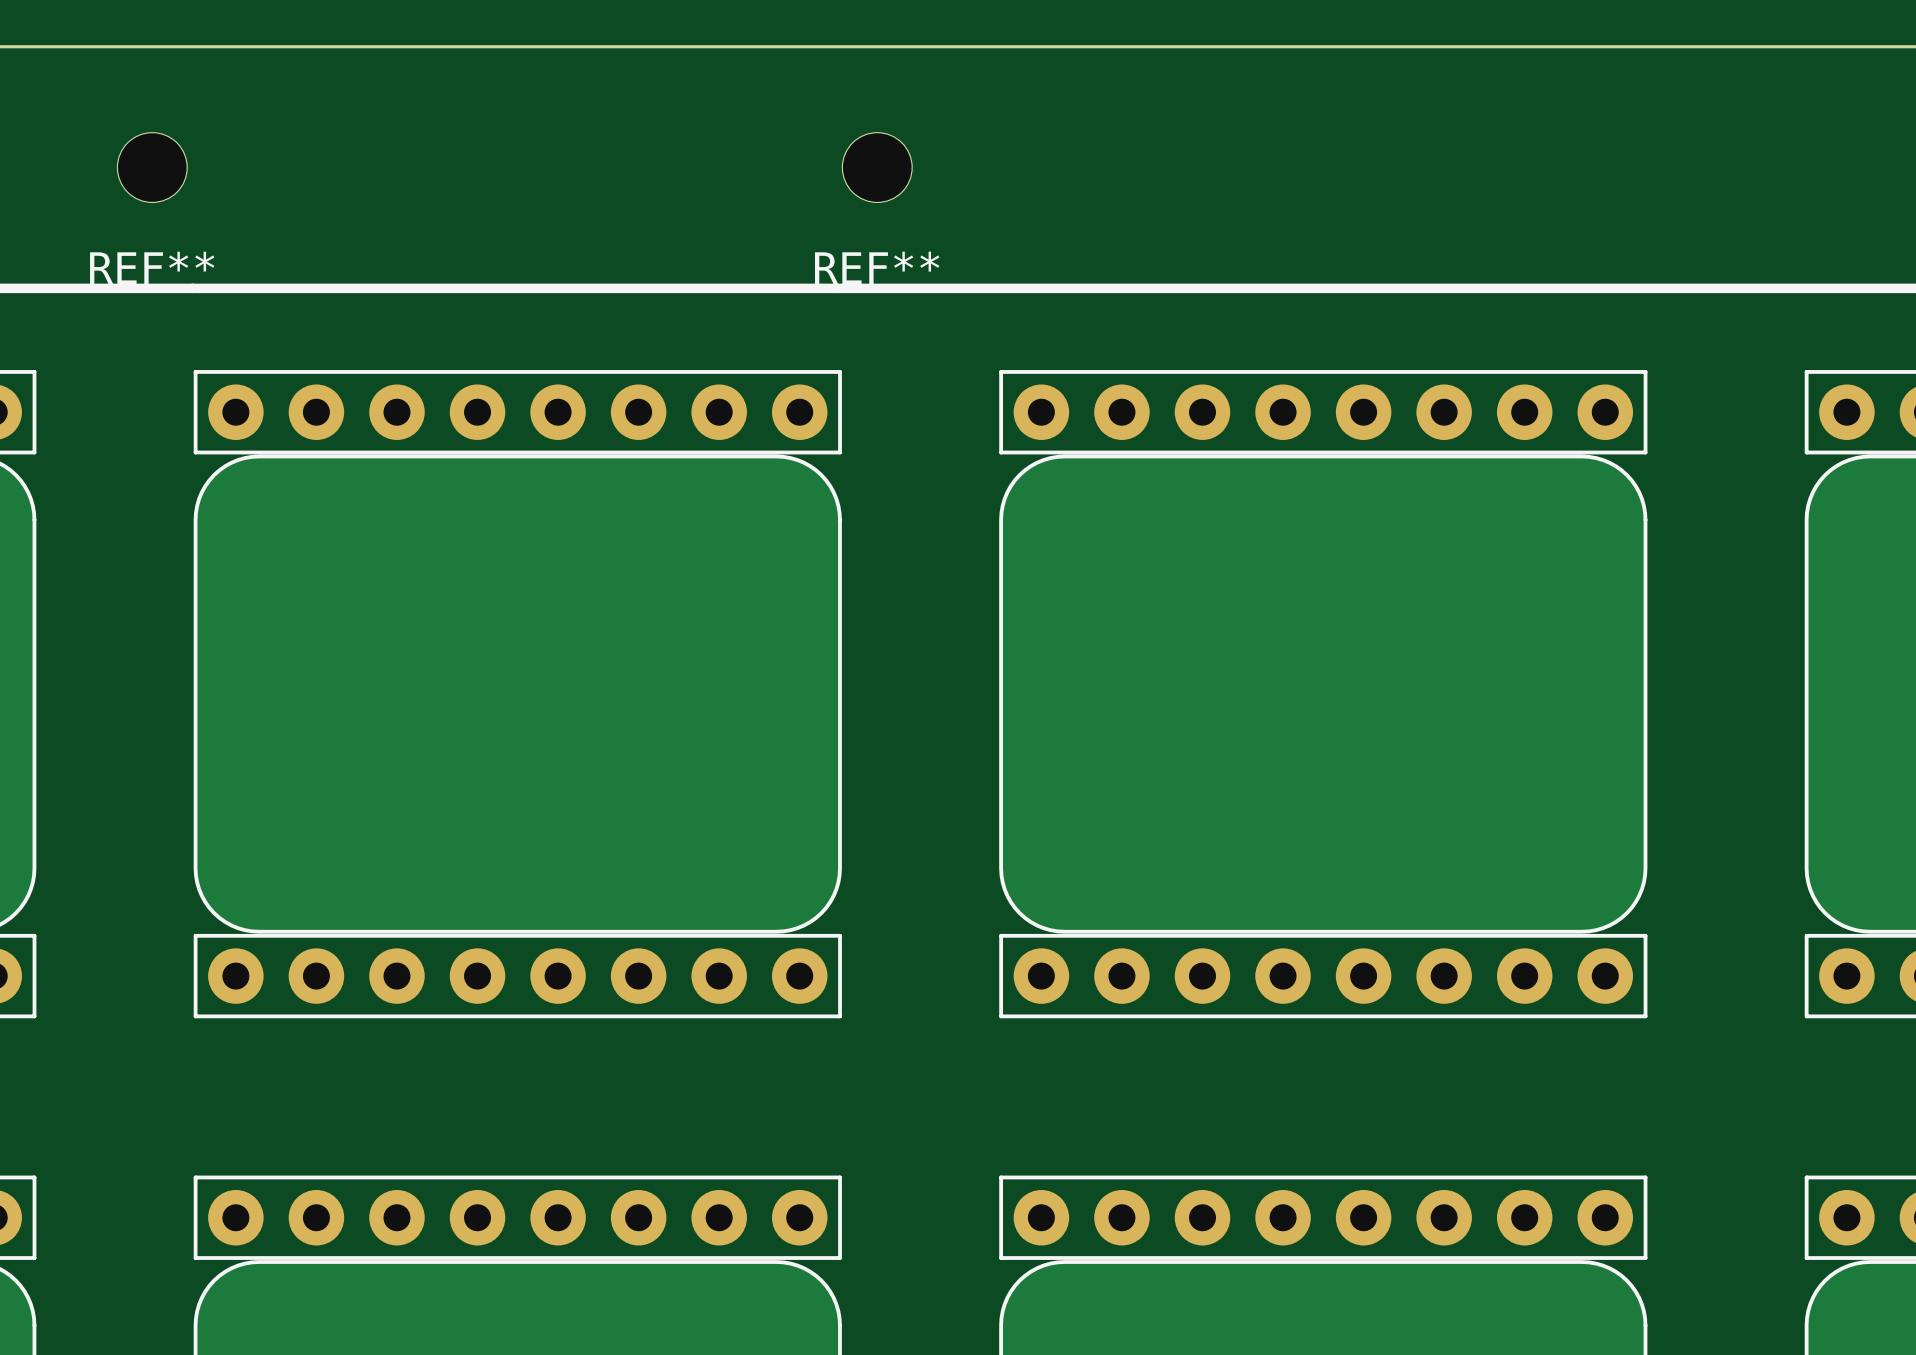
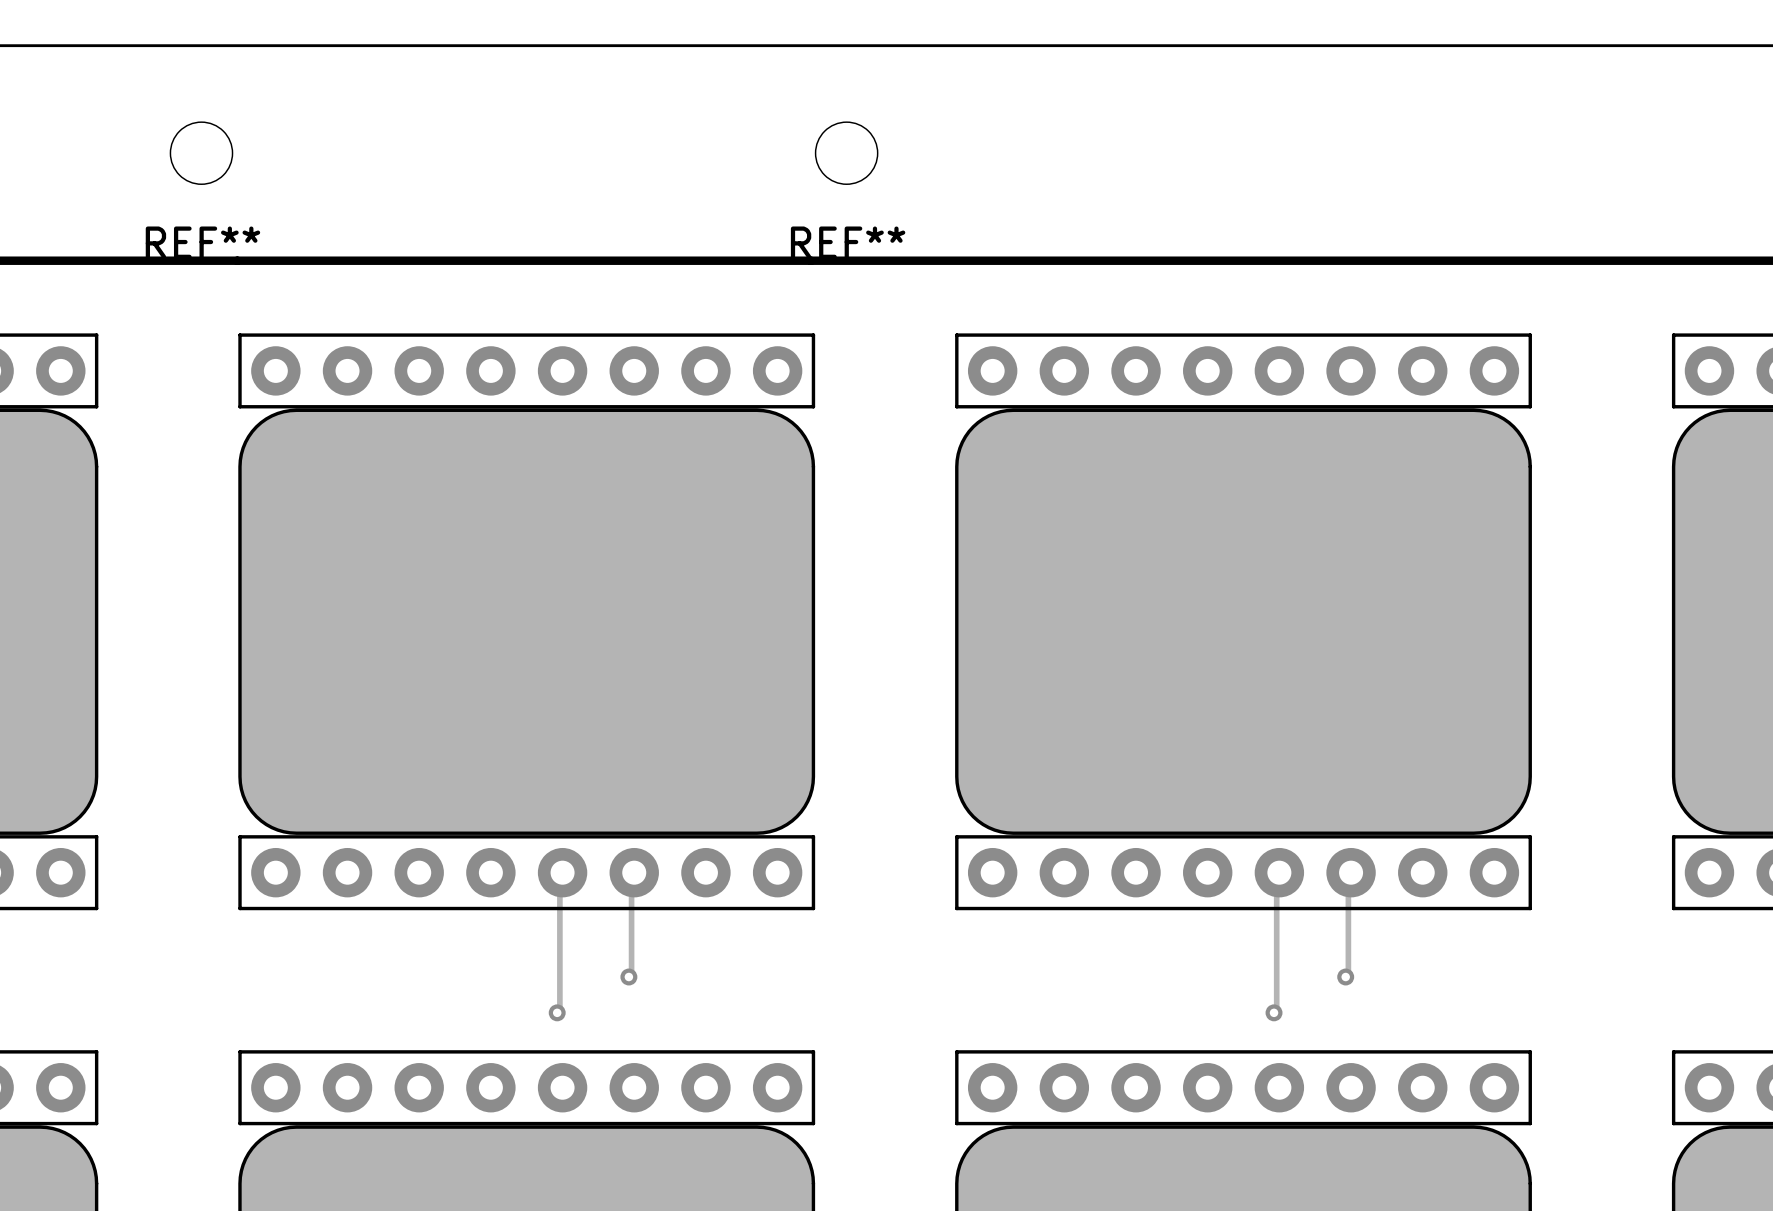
track: none -> (559, 872) (559, 1010) (557, 1012)
track: none -> (631, 872) (631, 974) (628, 977)
track: none -> (1276, 872) (1276, 1010) (1274, 1012)
track: none -> (1348, 872) (1348, 974) (1345, 977)
via: none -> (628, 977)
via: none -> (1345, 977)
via: none -> (557, 1012)
via: none -> (1274, 1012)

